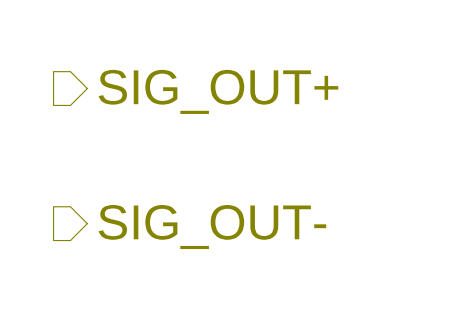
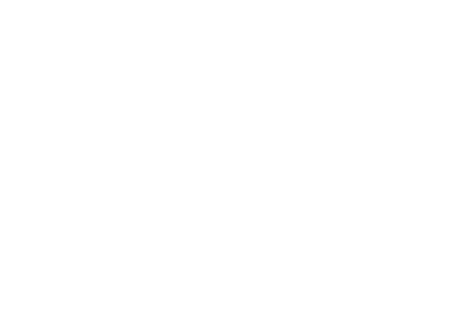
hierarchical label: SIG_OUT+ (218, 91) -> none
hierarchical label: SIG_OUT- (212, 227) -> none

